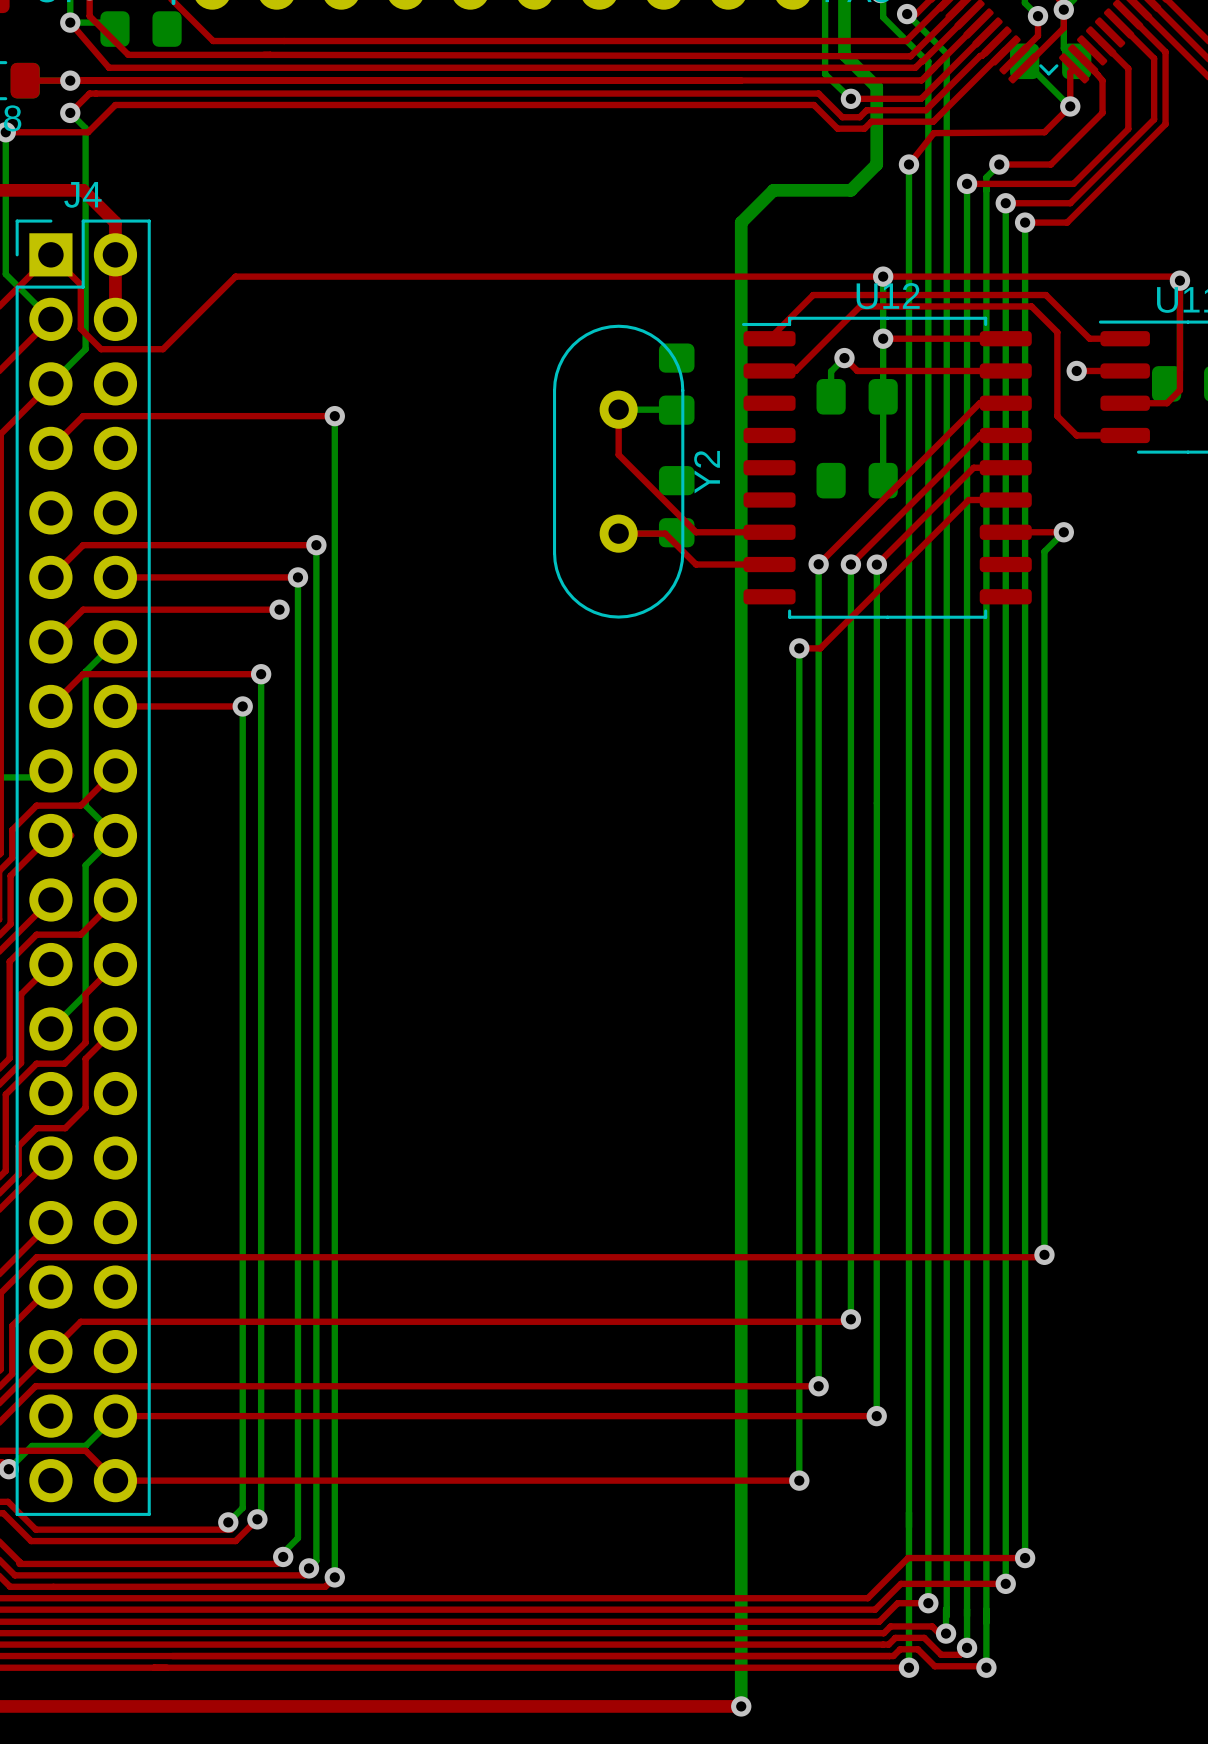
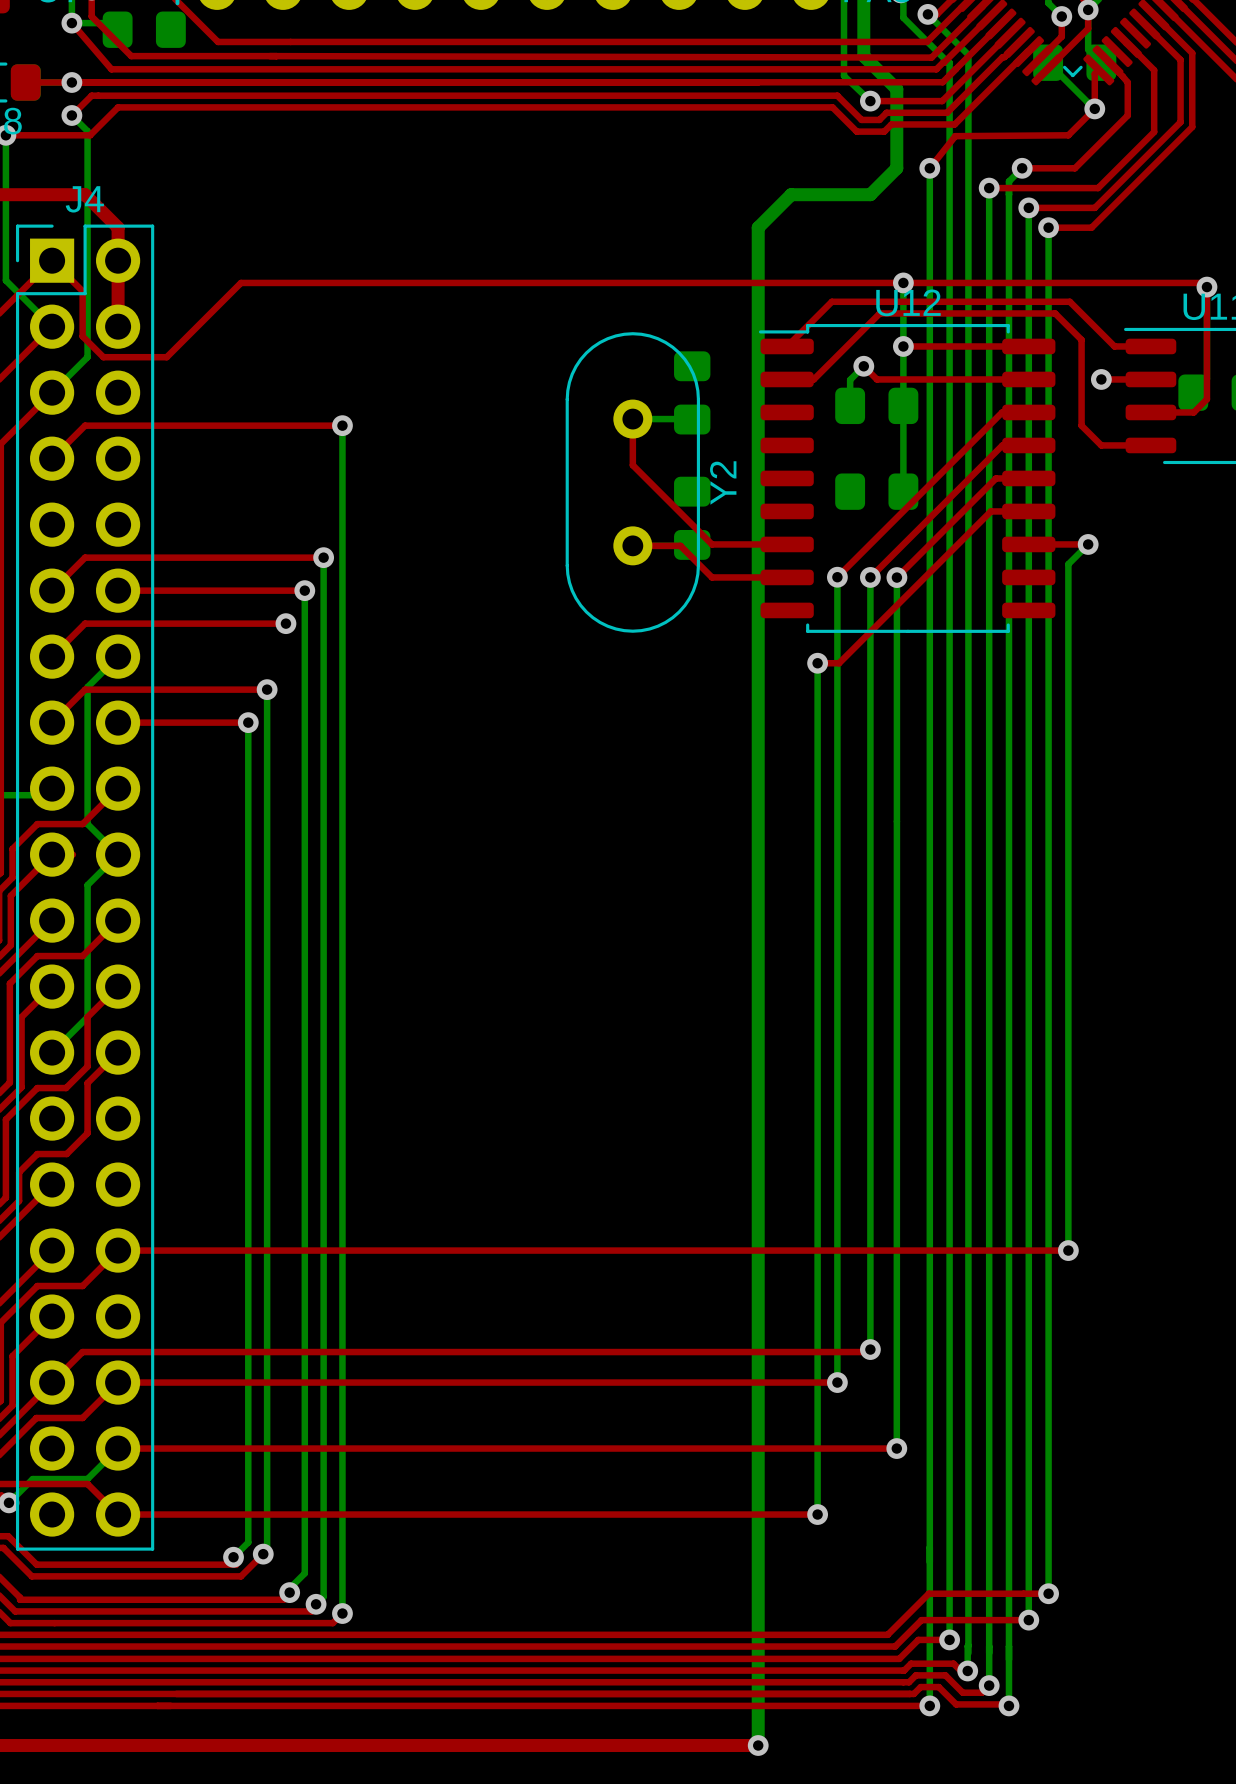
bottom track: (1044, 1222) (1044, 1254) -> none
top track: (1044, 1254) (1042, 1257) (80, 1257) -> (1068, 1250) (118, 1250) (82, 1286)
via position: (1044, 1254) -> (1068, 1250)
bottom track: (818, 1351) (818, 1386) -> none
top track: (80, 1386) (818, 1386) -> (82, 1418) (118, 1382) (837, 1382)
via position: (818, 1386) -> (837, 1382)

